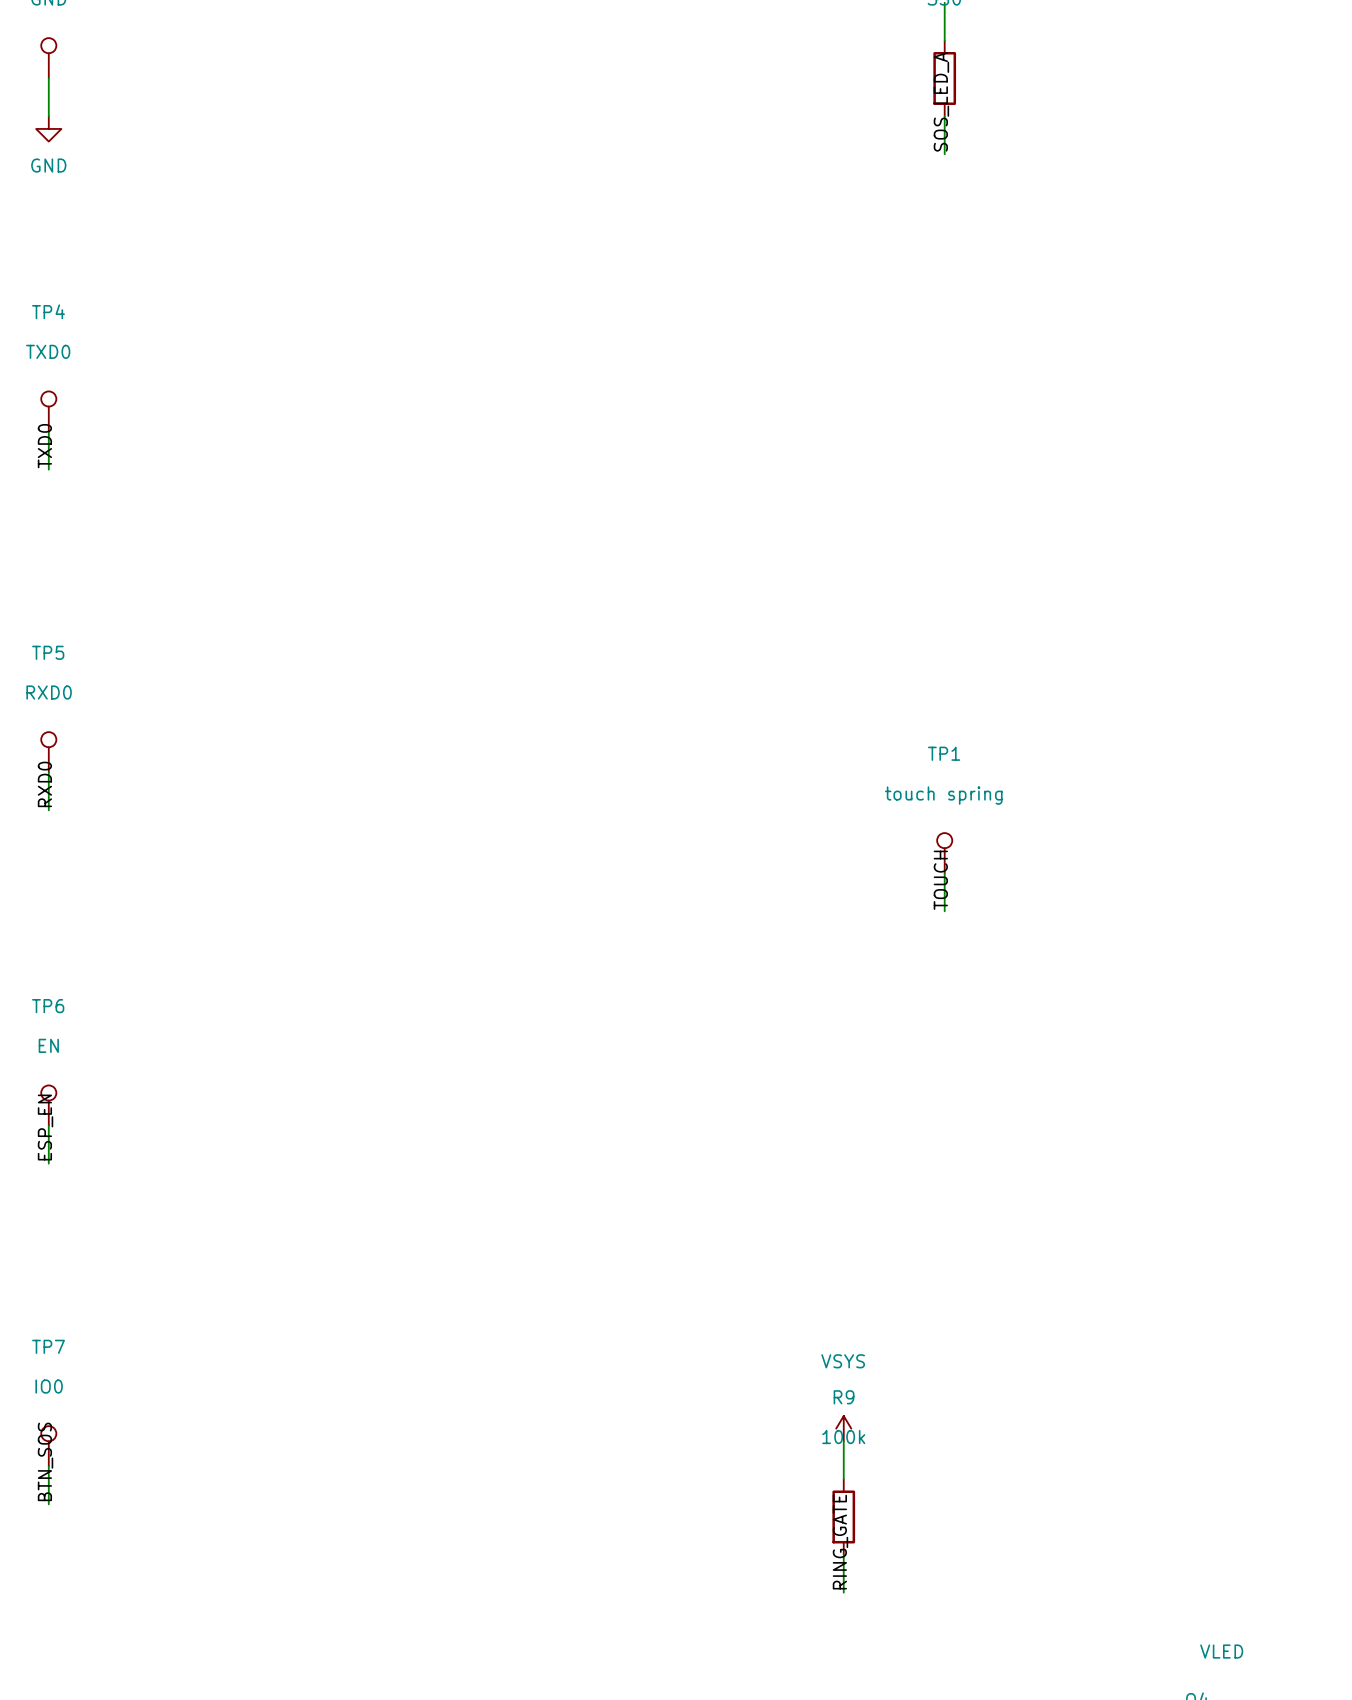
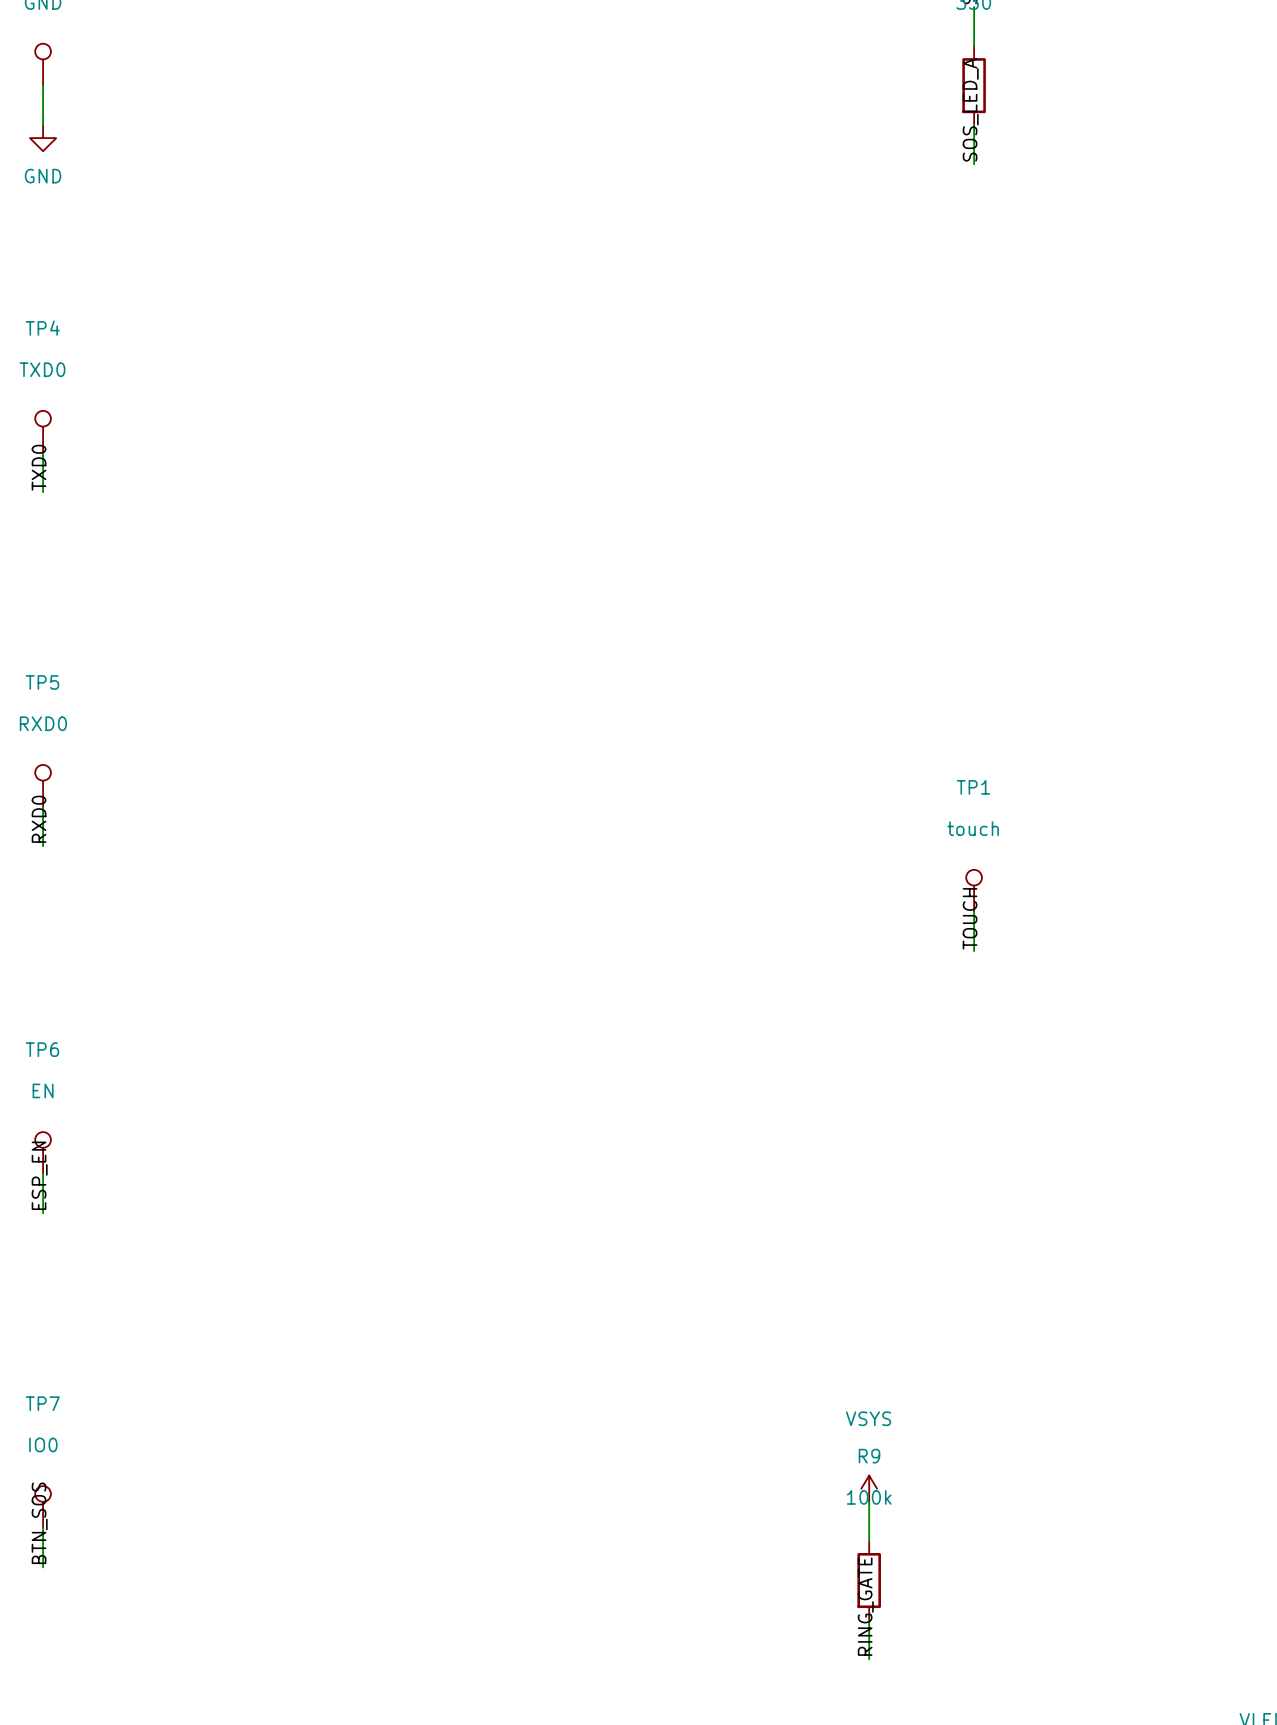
TP1 value: touch spring (943, 795) -> touch (973, 828)

